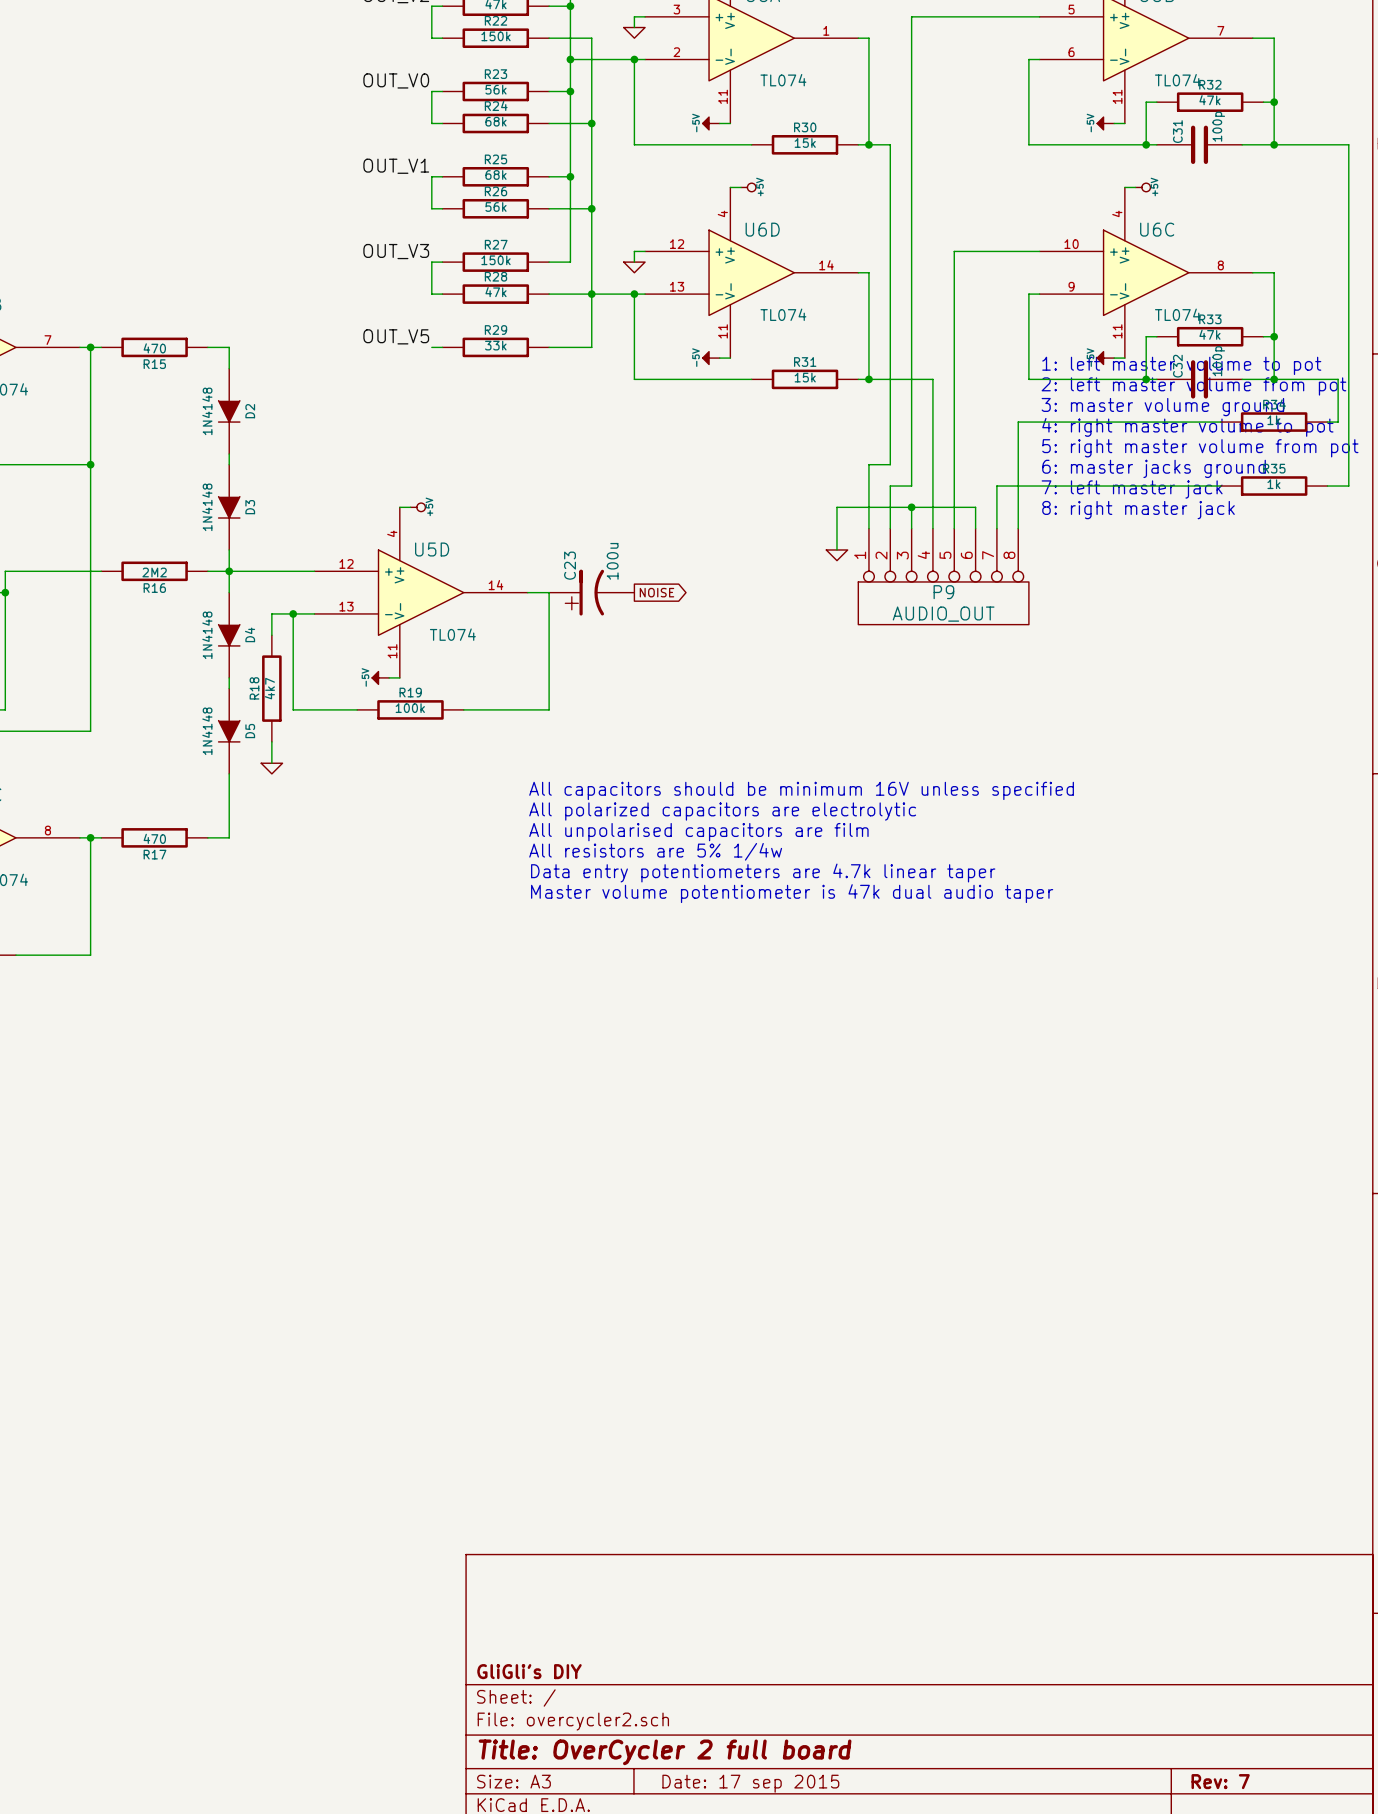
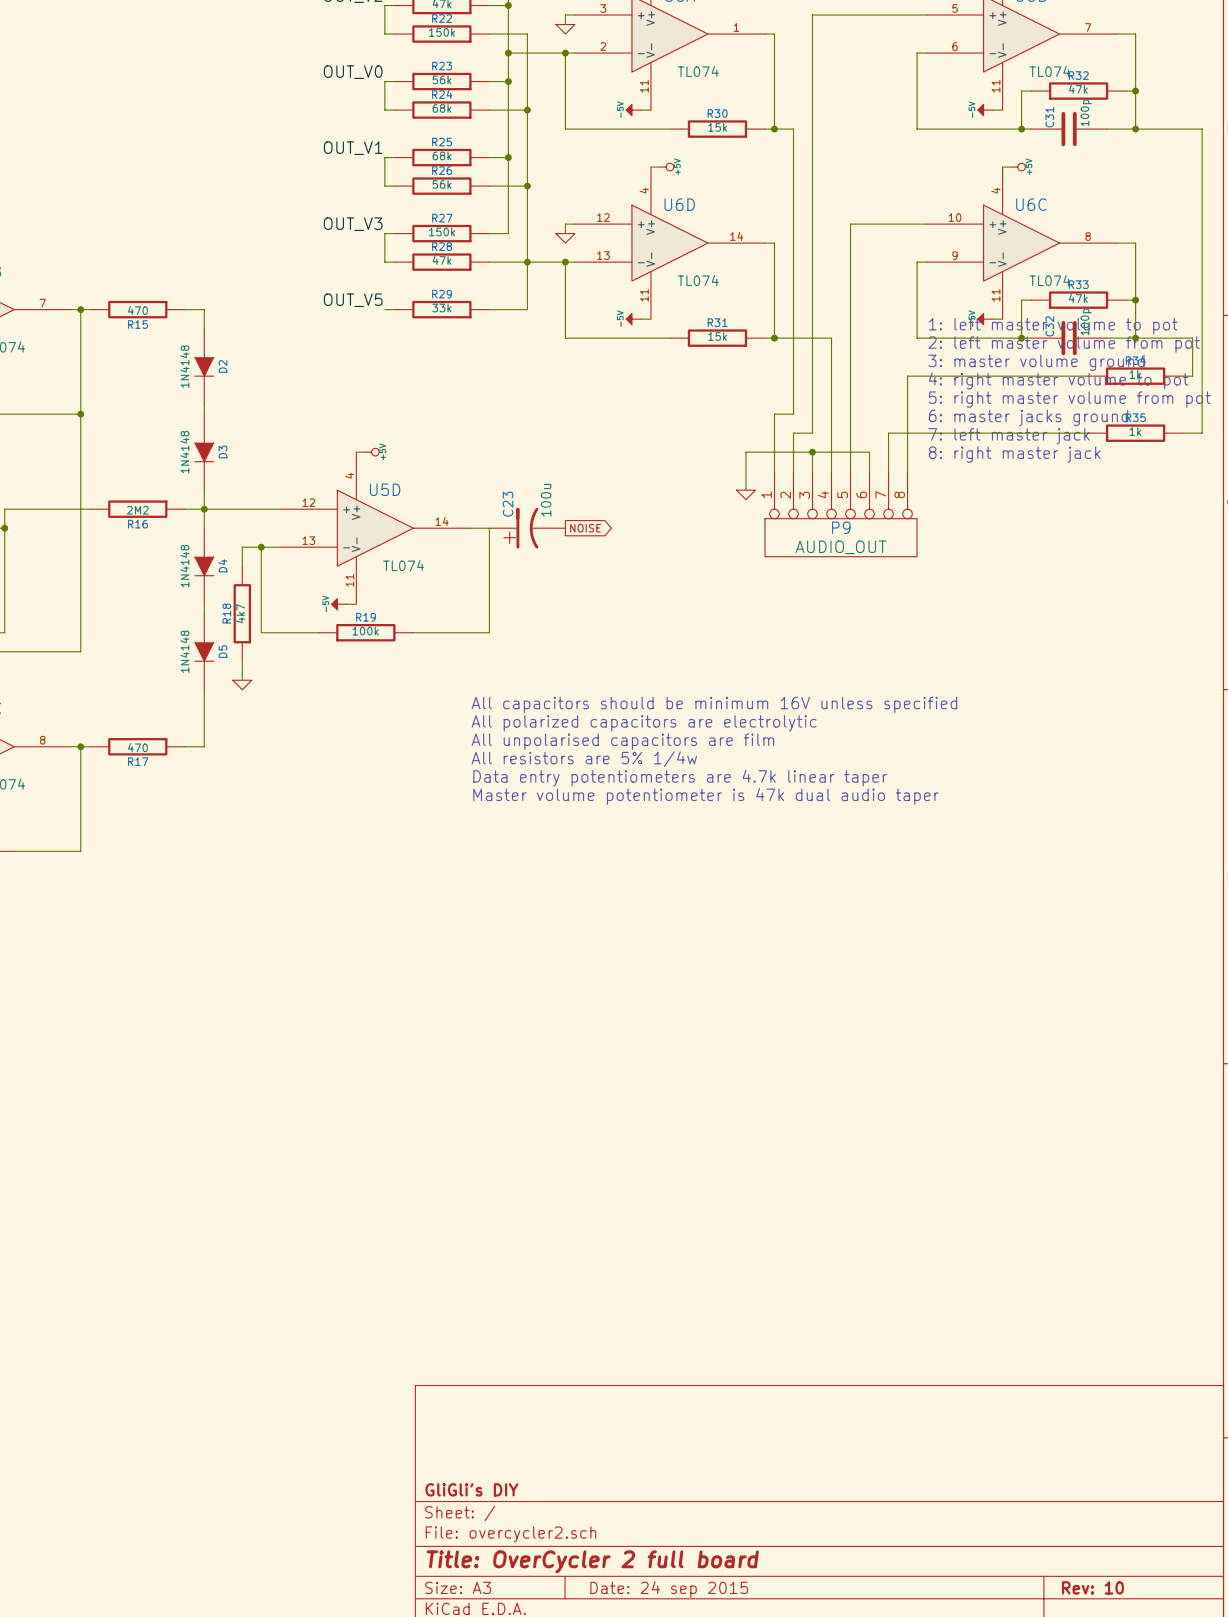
title block: Rev: 7 (1220, 1781) -> Rev: 10 (1092, 1587)
title block: Date: 17 sep 2015 (750, 1783) -> Date: 24 sep 2015 (669, 1589)

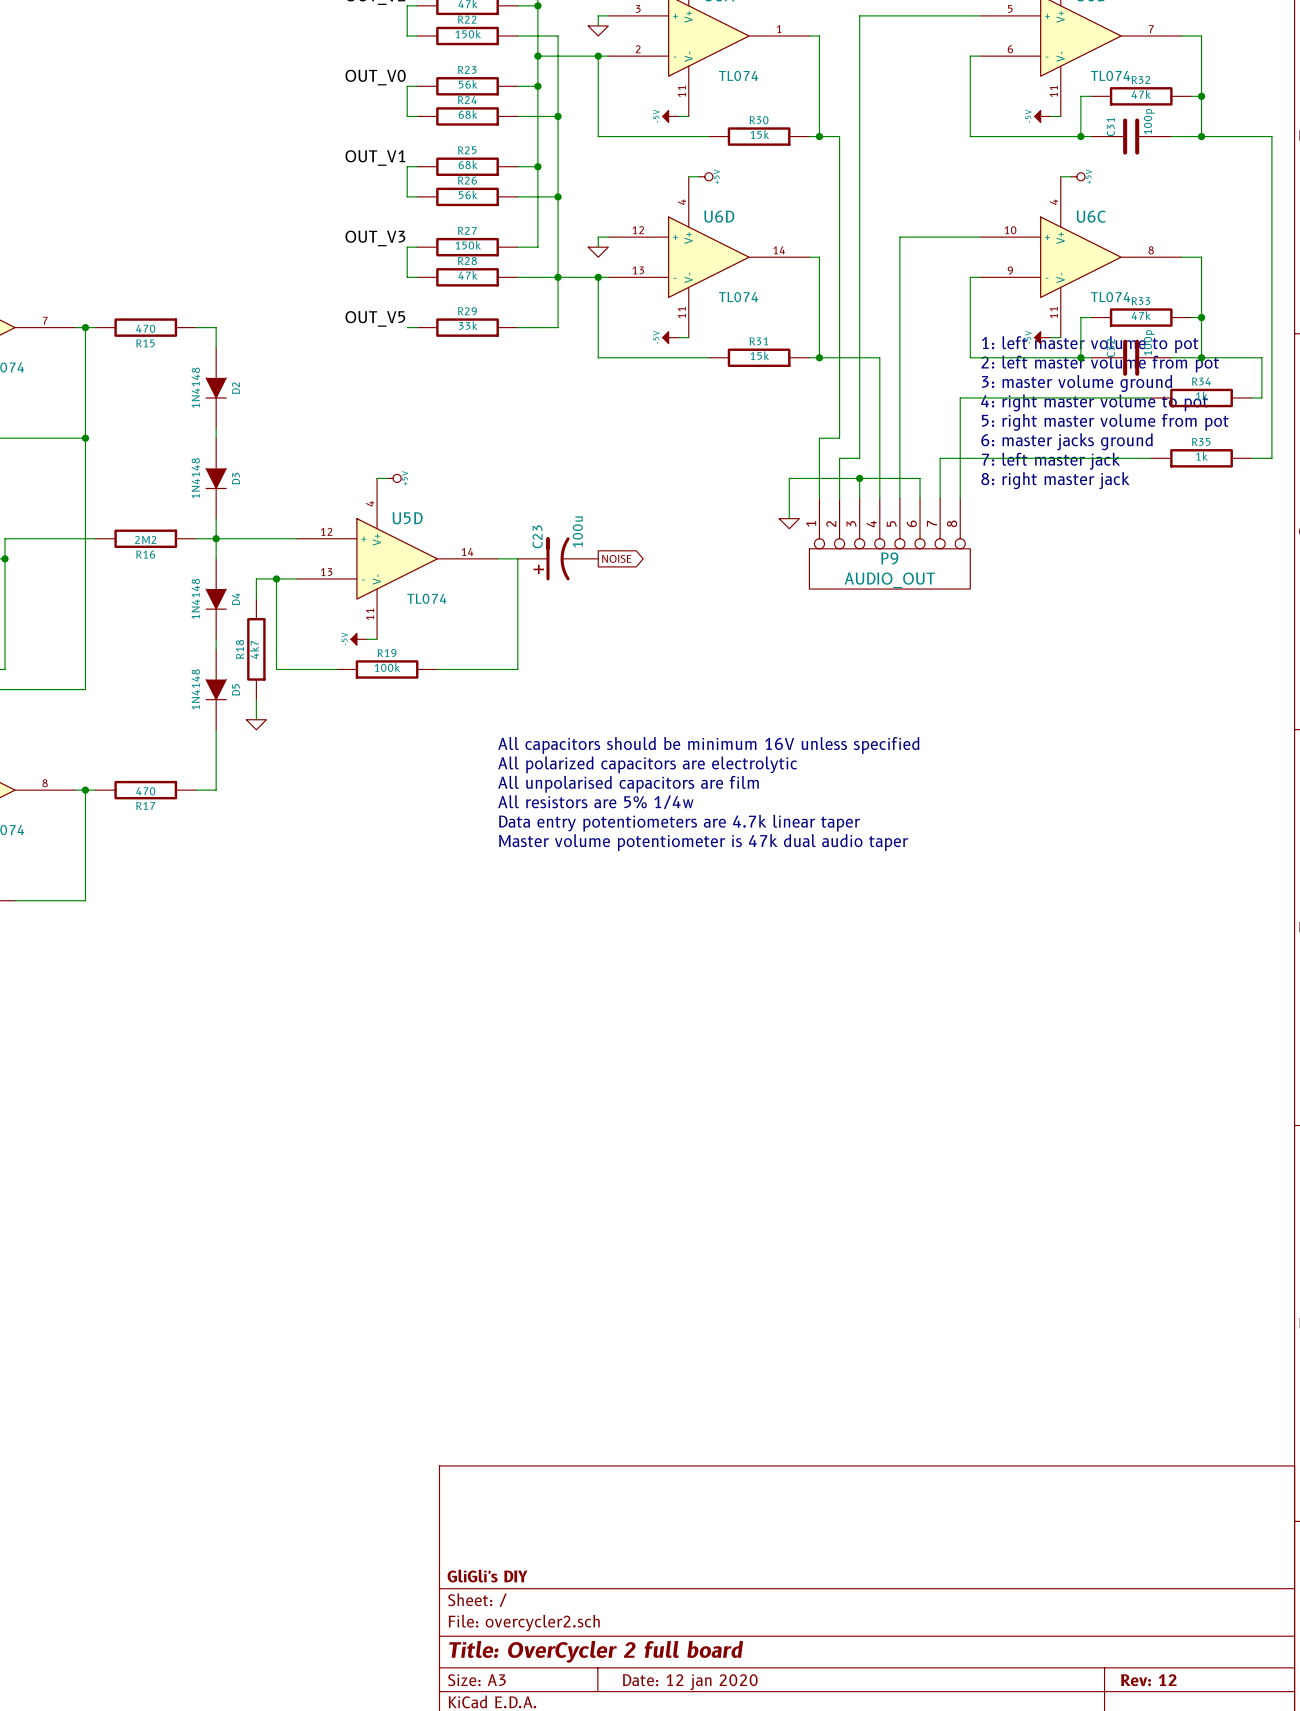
title block: Rev: 10 (1092, 1587) -> Rev: 12 (1148, 1680)
title block: Date: 24 sep 2015 (669, 1589) -> Date: 12 jan 2020 (690, 1682)

